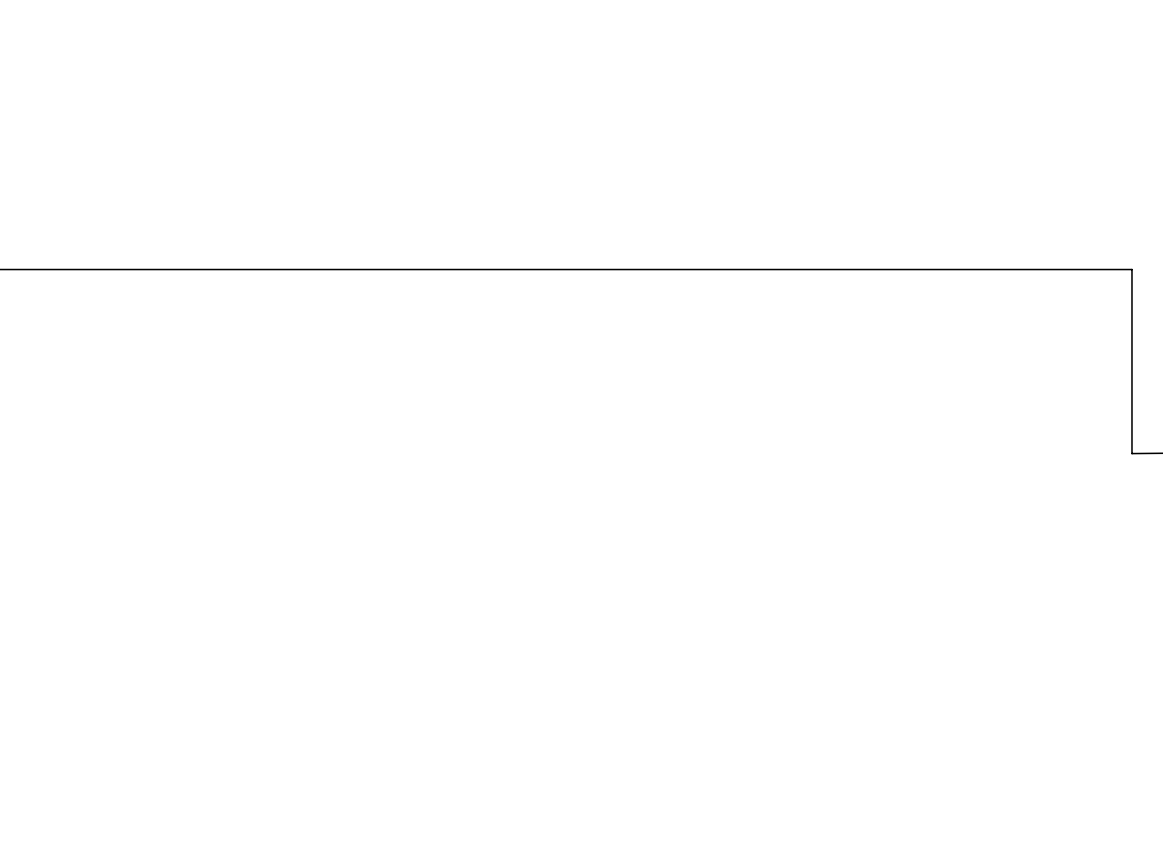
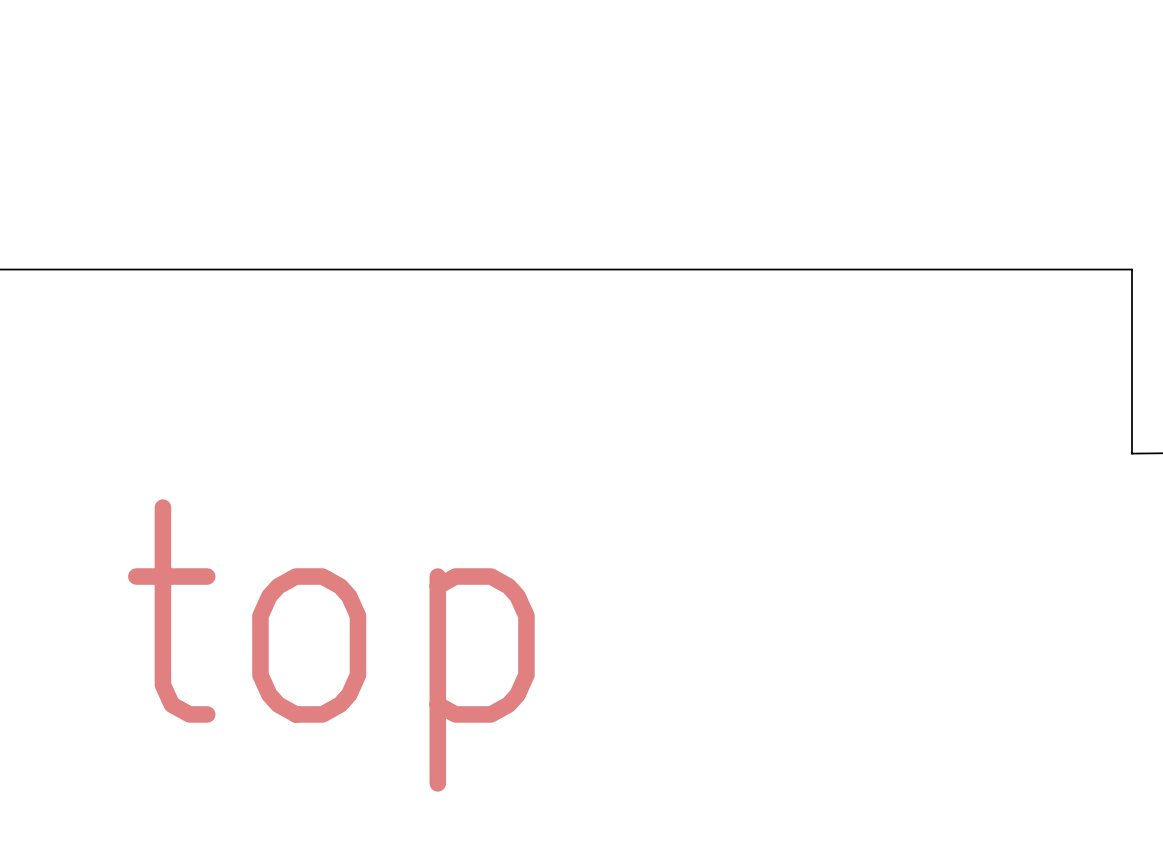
text: none -> top (331, 645)

